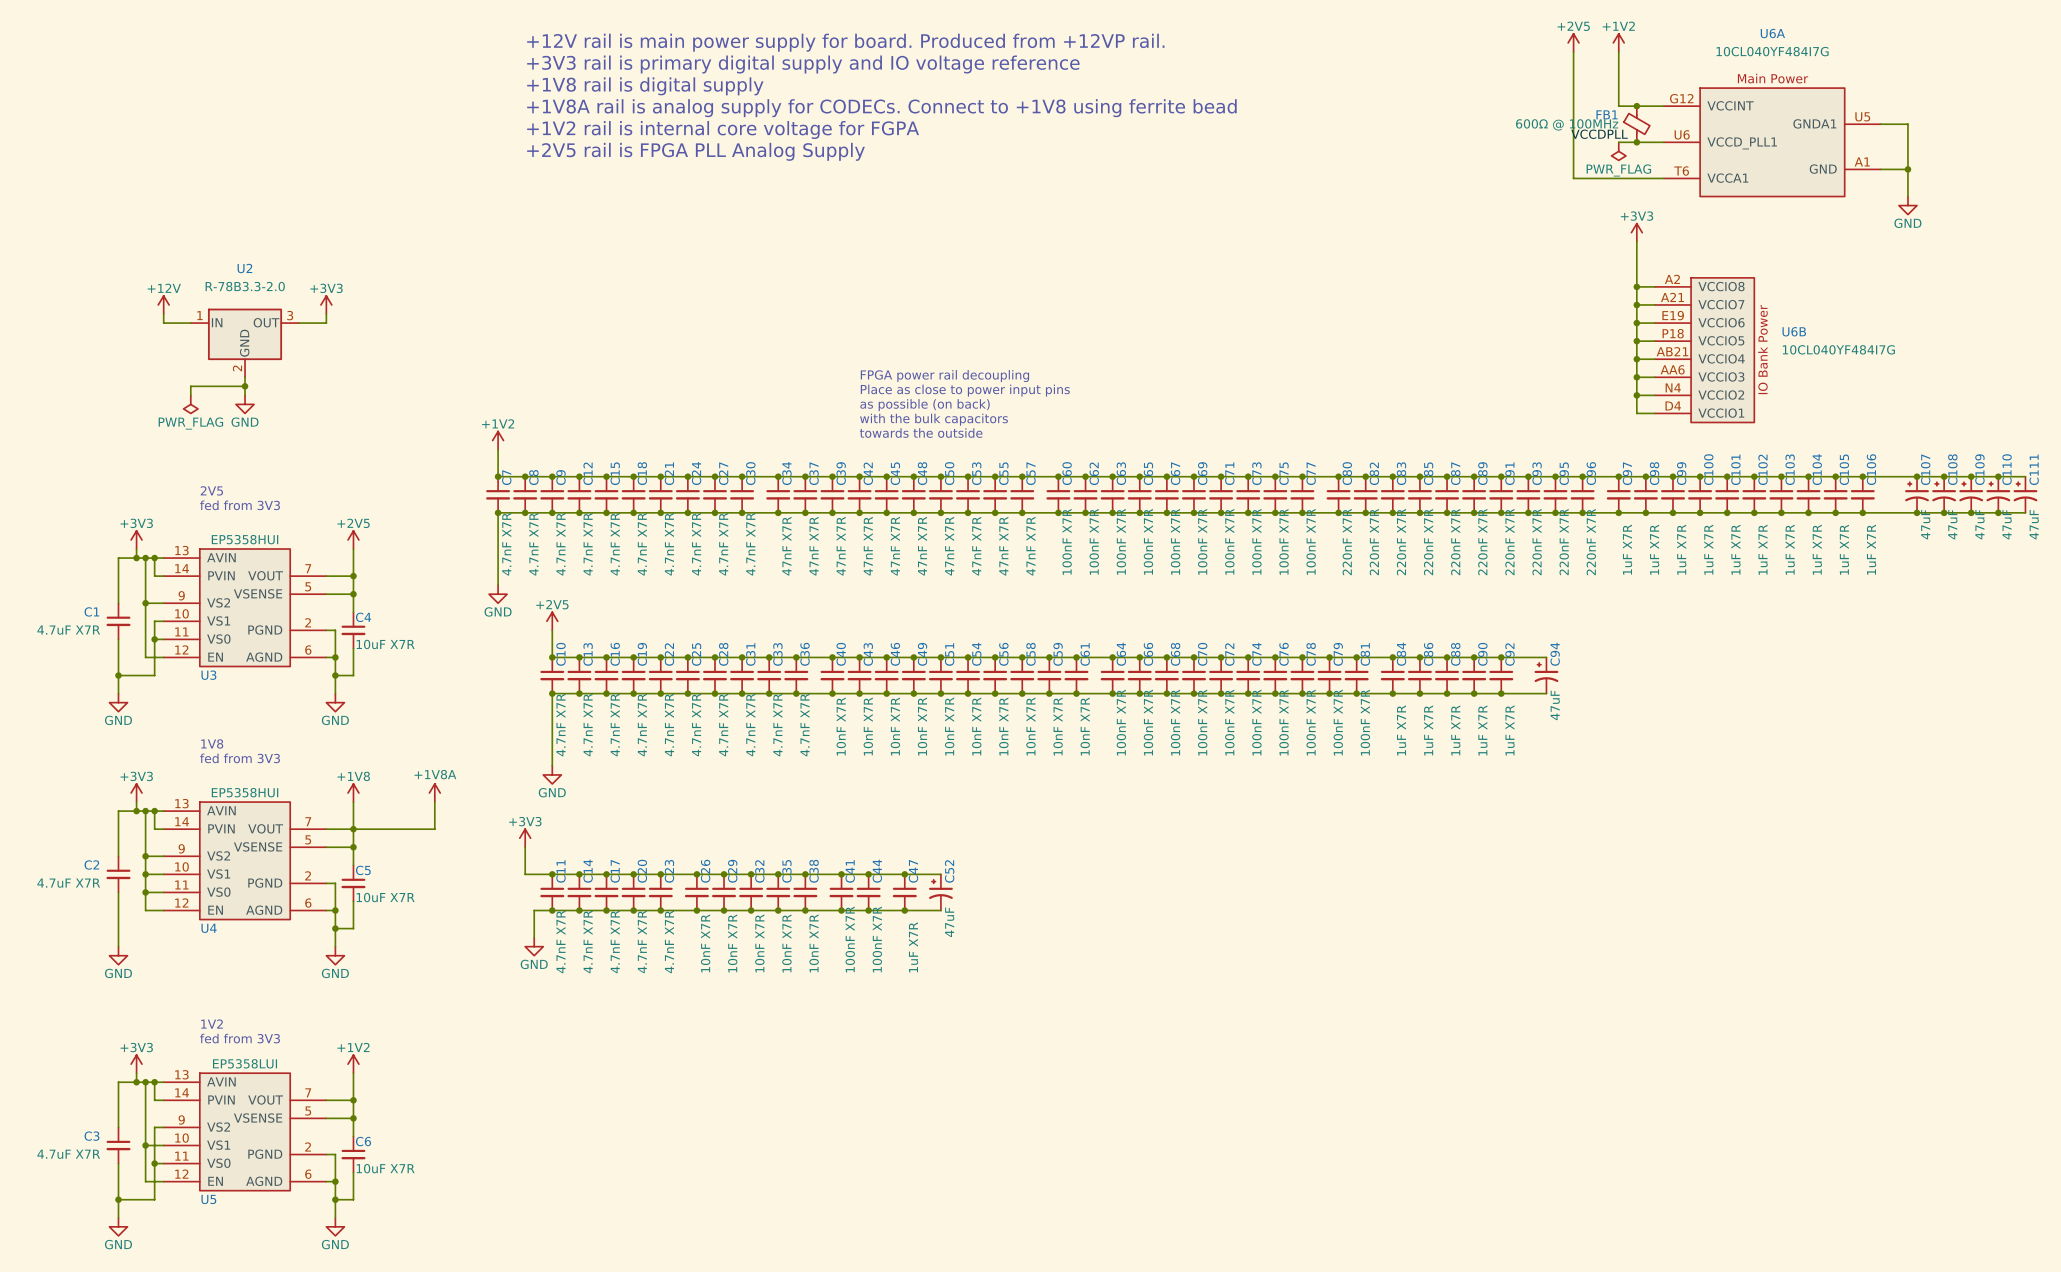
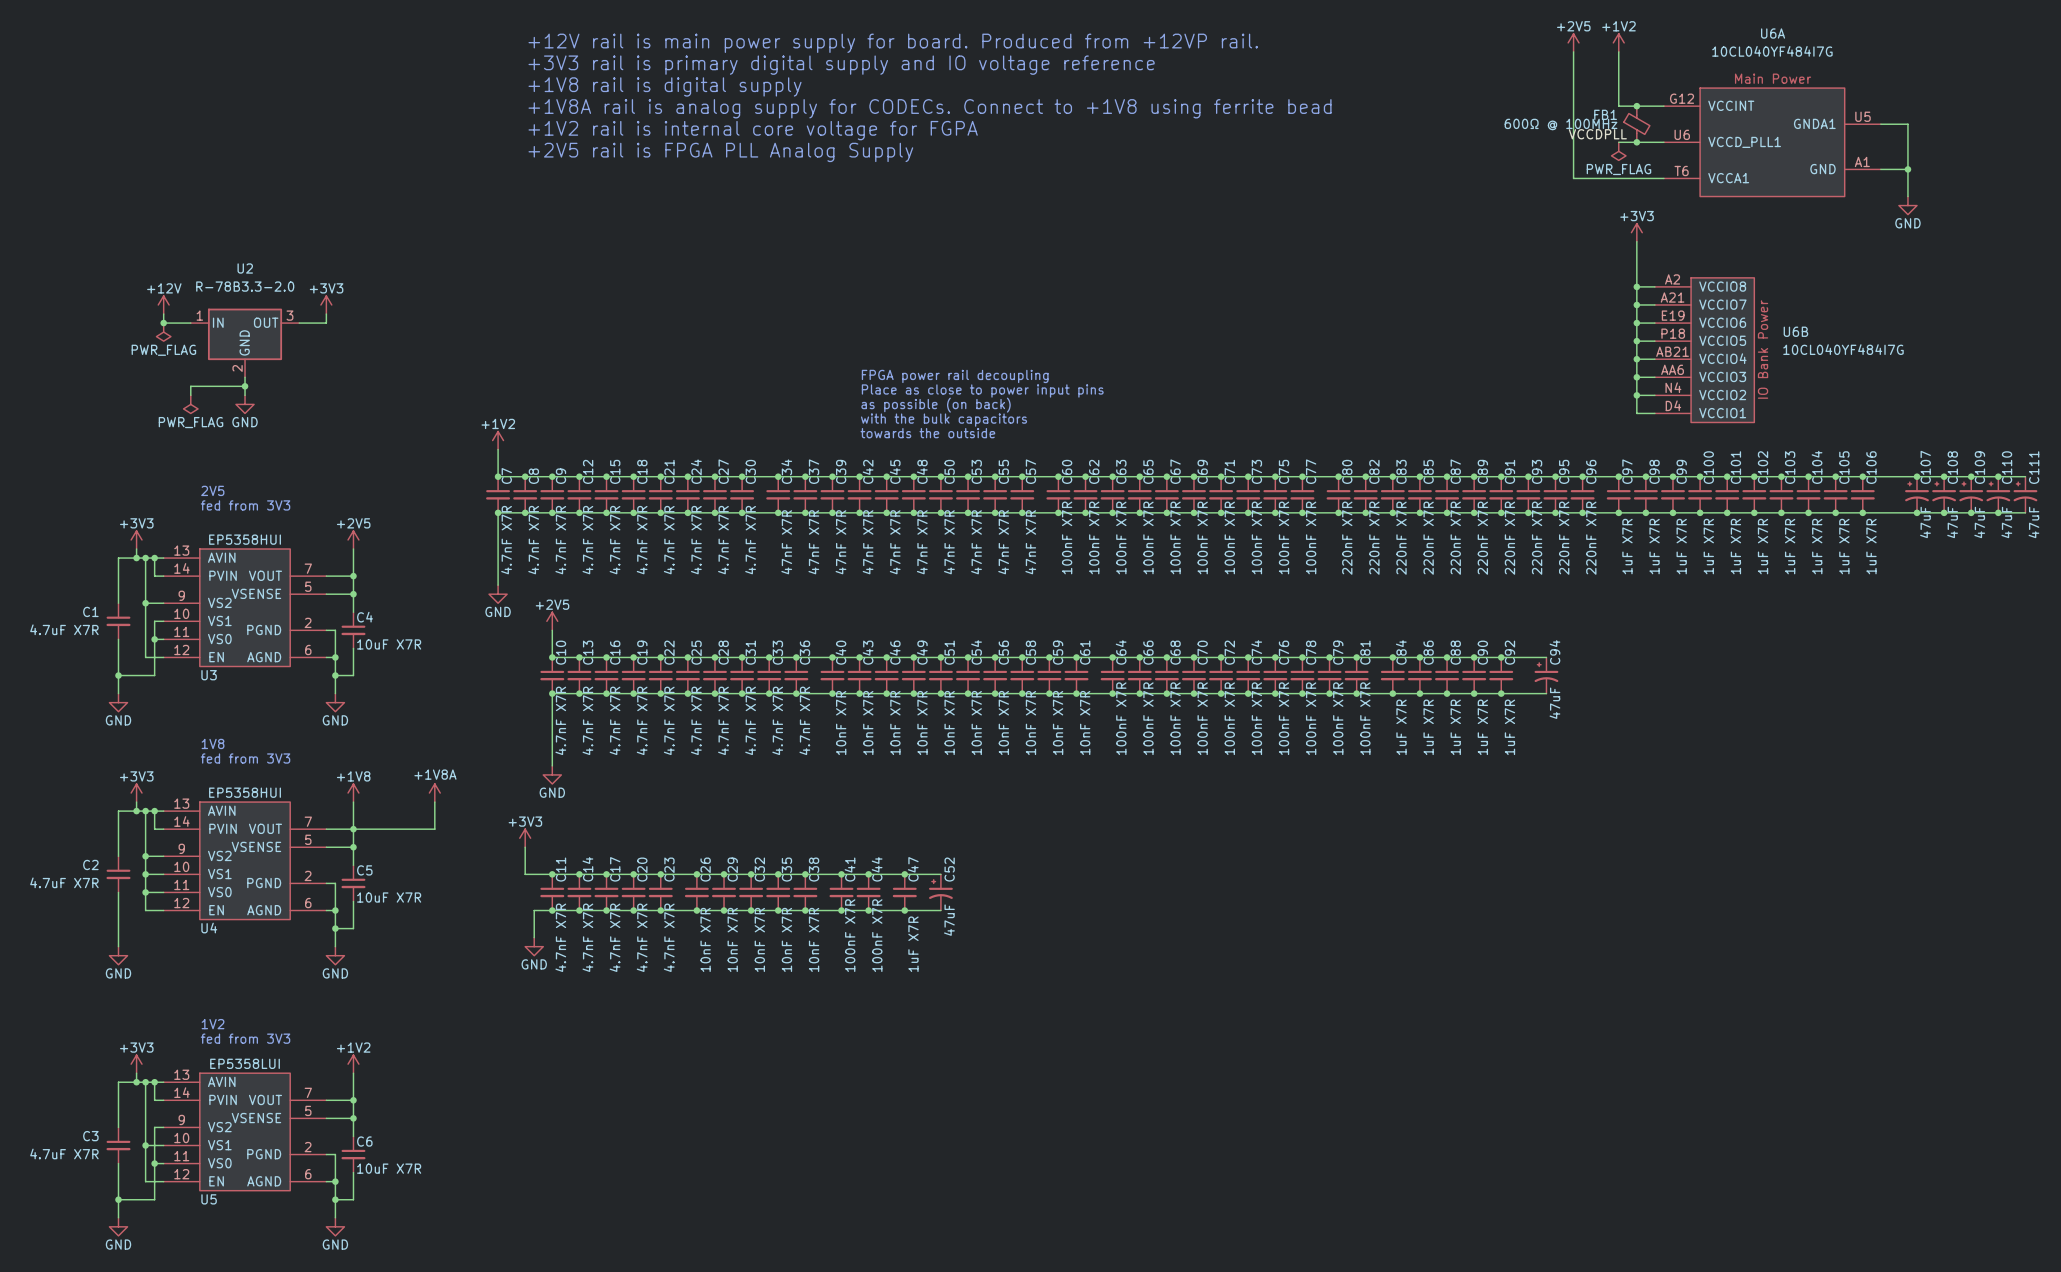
junction: none -> (163, 323)
power symbol: none -> PWR_FLAG (163, 332)

